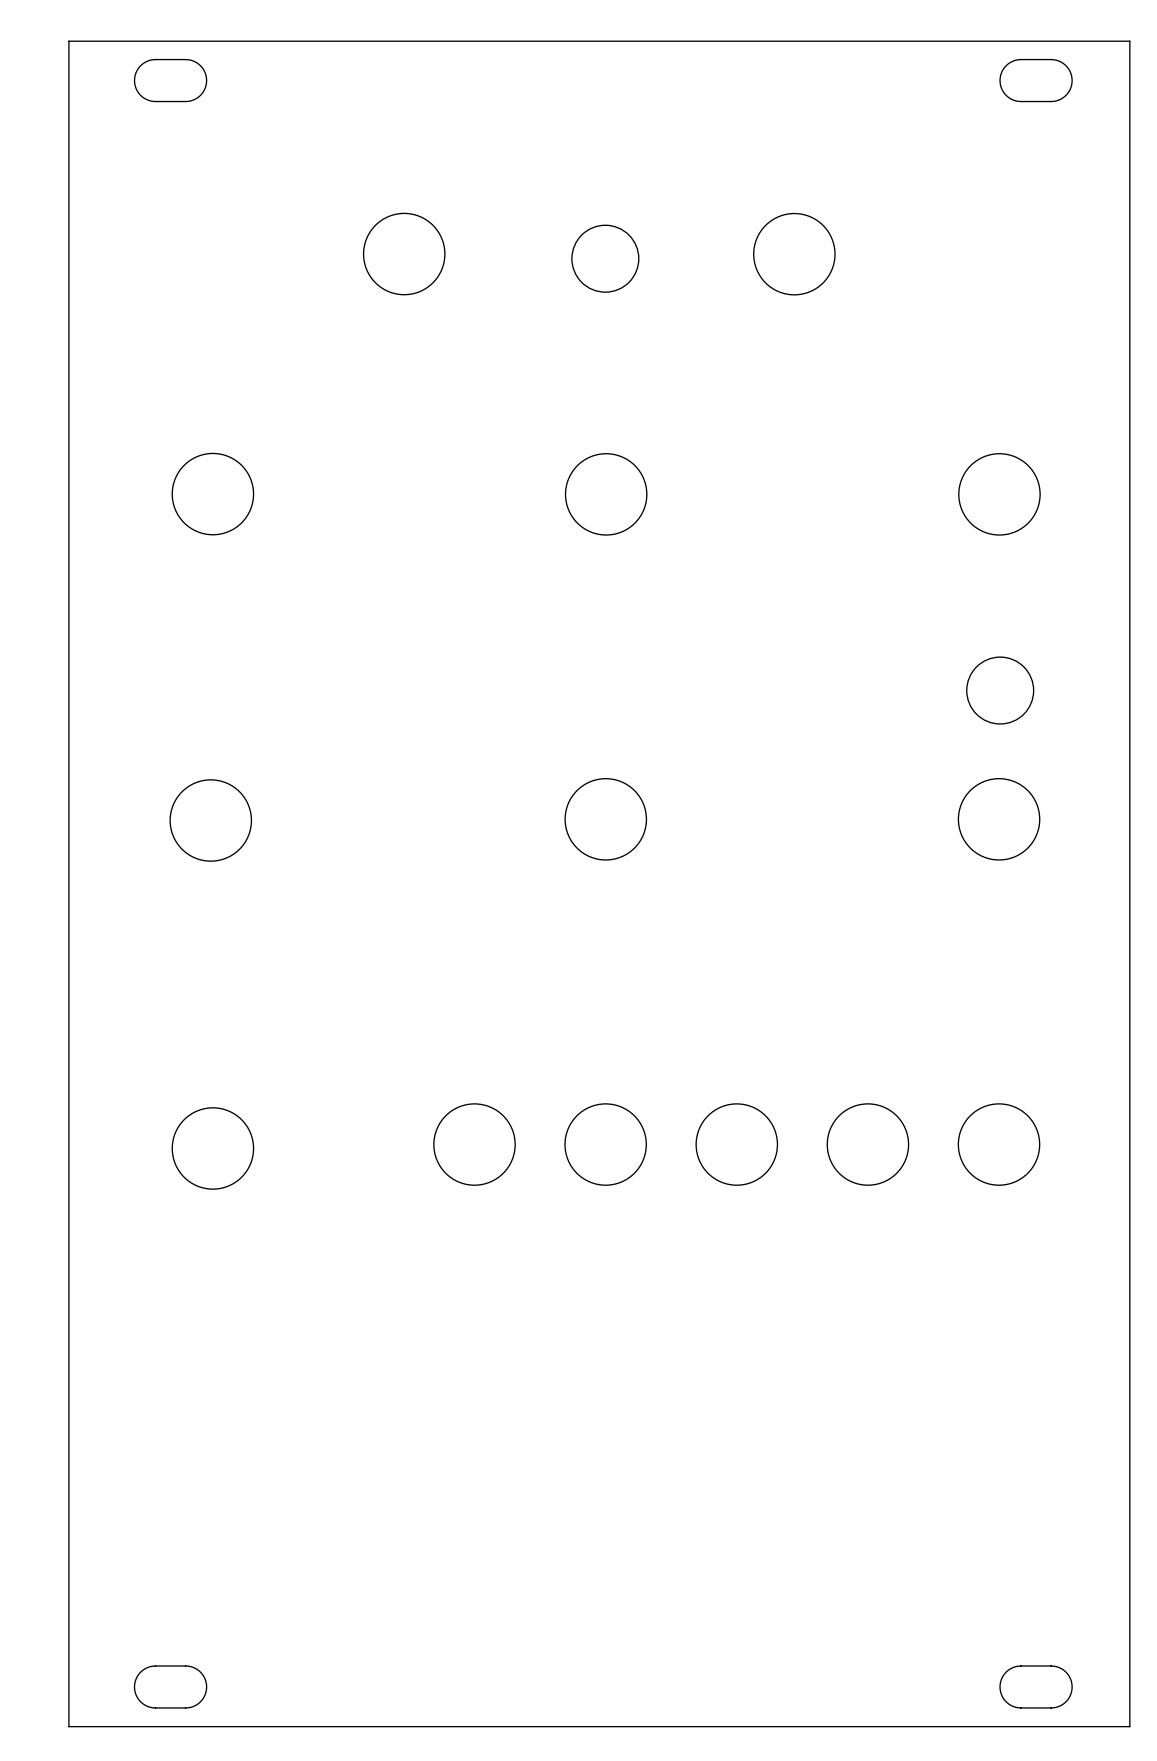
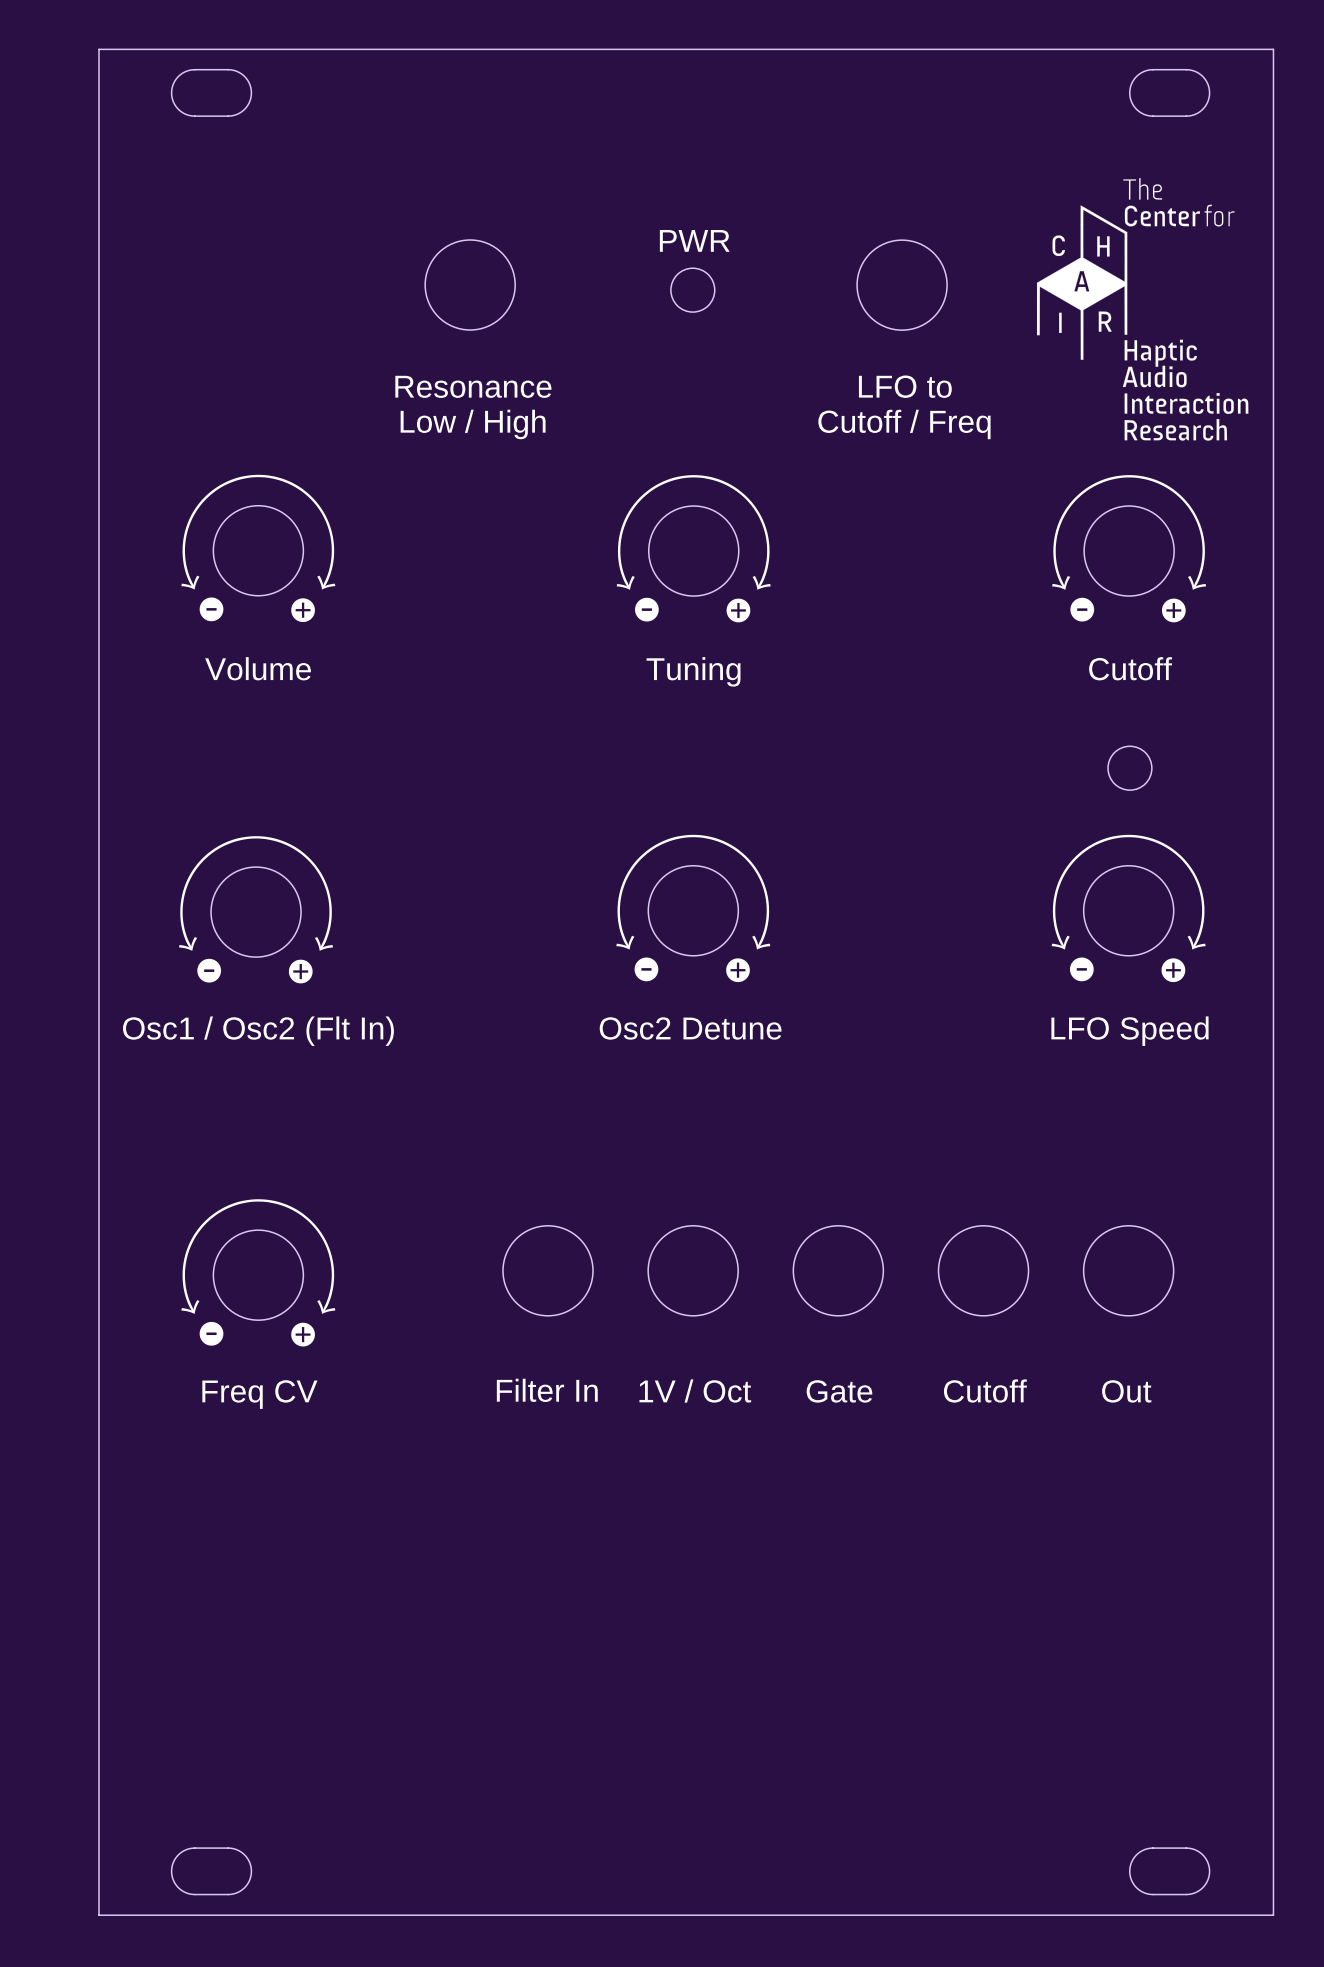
drawing: none -> [1036, 178, 1249, 441]
text: none -> PWR (694, 240)
round board edge size: [571, 224, 640, 293] -> [670, 267, 716, 313]
text: none -> Resonance (473, 386)
text: none -> LFO to (905, 386)
text: none -> Low / High (473, 424)
text: none -> Cutoff / Freq (904, 424)
drawing: none -> [181, 474, 336, 623]
drawing: none -> [616, 475, 771, 623]
drawing: none -> [1052, 475, 1207, 623]
text: none -> Volume (258, 668)
text: none -> Cutoff (1130, 668)
text: none -> Tuning (693, 671)
round board edge size: [966, 656, 1035, 725] -> [1107, 745, 1153, 791]
drawing: none -> [616, 834, 771, 983]
drawing: none -> [1051, 834, 1206, 983]
drawing: none -> [179, 836, 334, 984]
text: none -> Osc2 Detune (690, 1028)
text: none -> Osc1 / Osc2 (Flt In) (258, 1031)
text: none -> LFO Speed (1130, 1031)
drawing: none -> [181, 1199, 336, 1347]
text: none -> Filter In (547, 1390)
text: none -> Gate (839, 1391)
text: none -> Cutoff (985, 1391)
text: none -> Out (1126, 1391)
text: none -> 1V / Oct (695, 1390)
text: none -> Freq CV (259, 1394)

